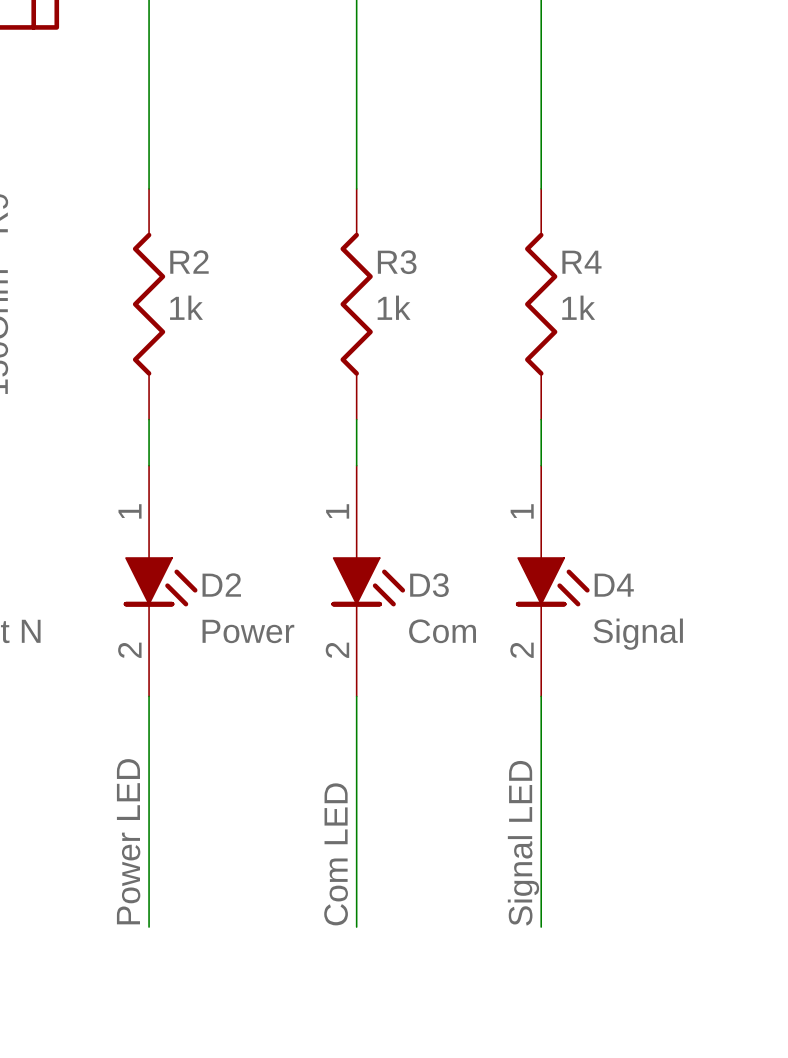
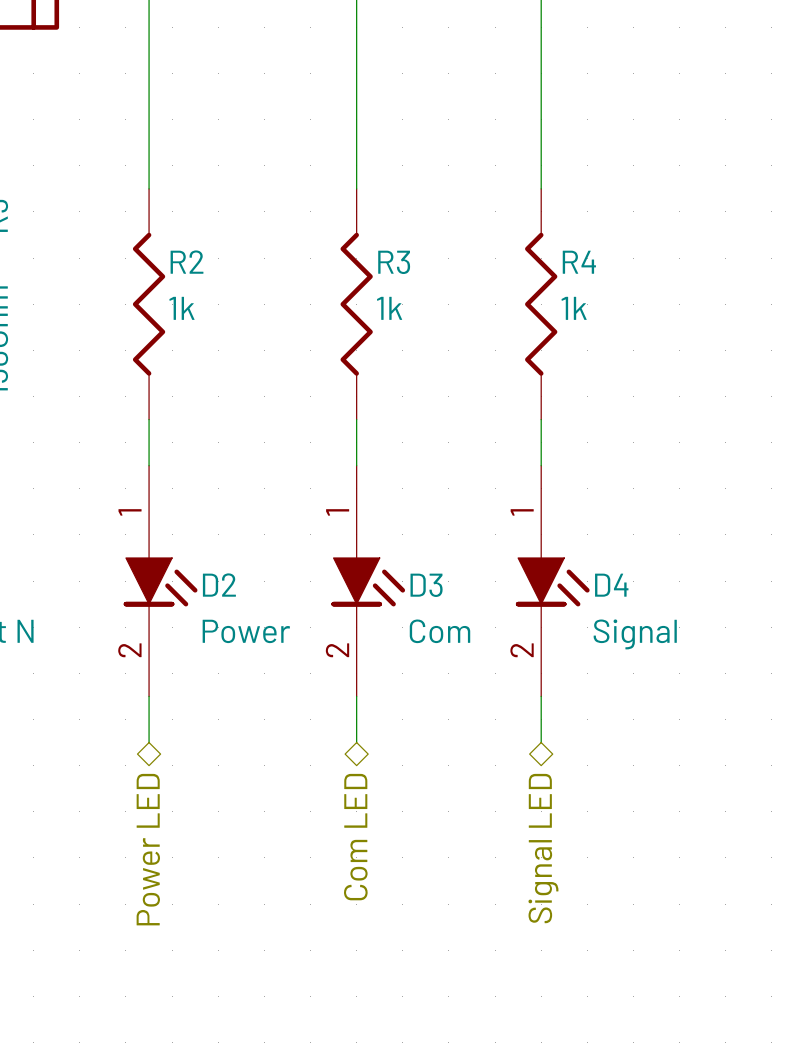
wire: (149, 742) (149, 927) -> none
wire: (356, 742) (356, 927) -> none
wire: (541, 742) (541, 927) -> none
label: Power LED (128, 841) -> none
label: Signal LED (523, 843) -> none
hierarchical label: none -> Com LED (355, 837)
label: Com LED (336, 854) -> none
hierarchical label: none -> Signal LED (543, 848)
hierarchical label: none -> Power LED (148, 849)

